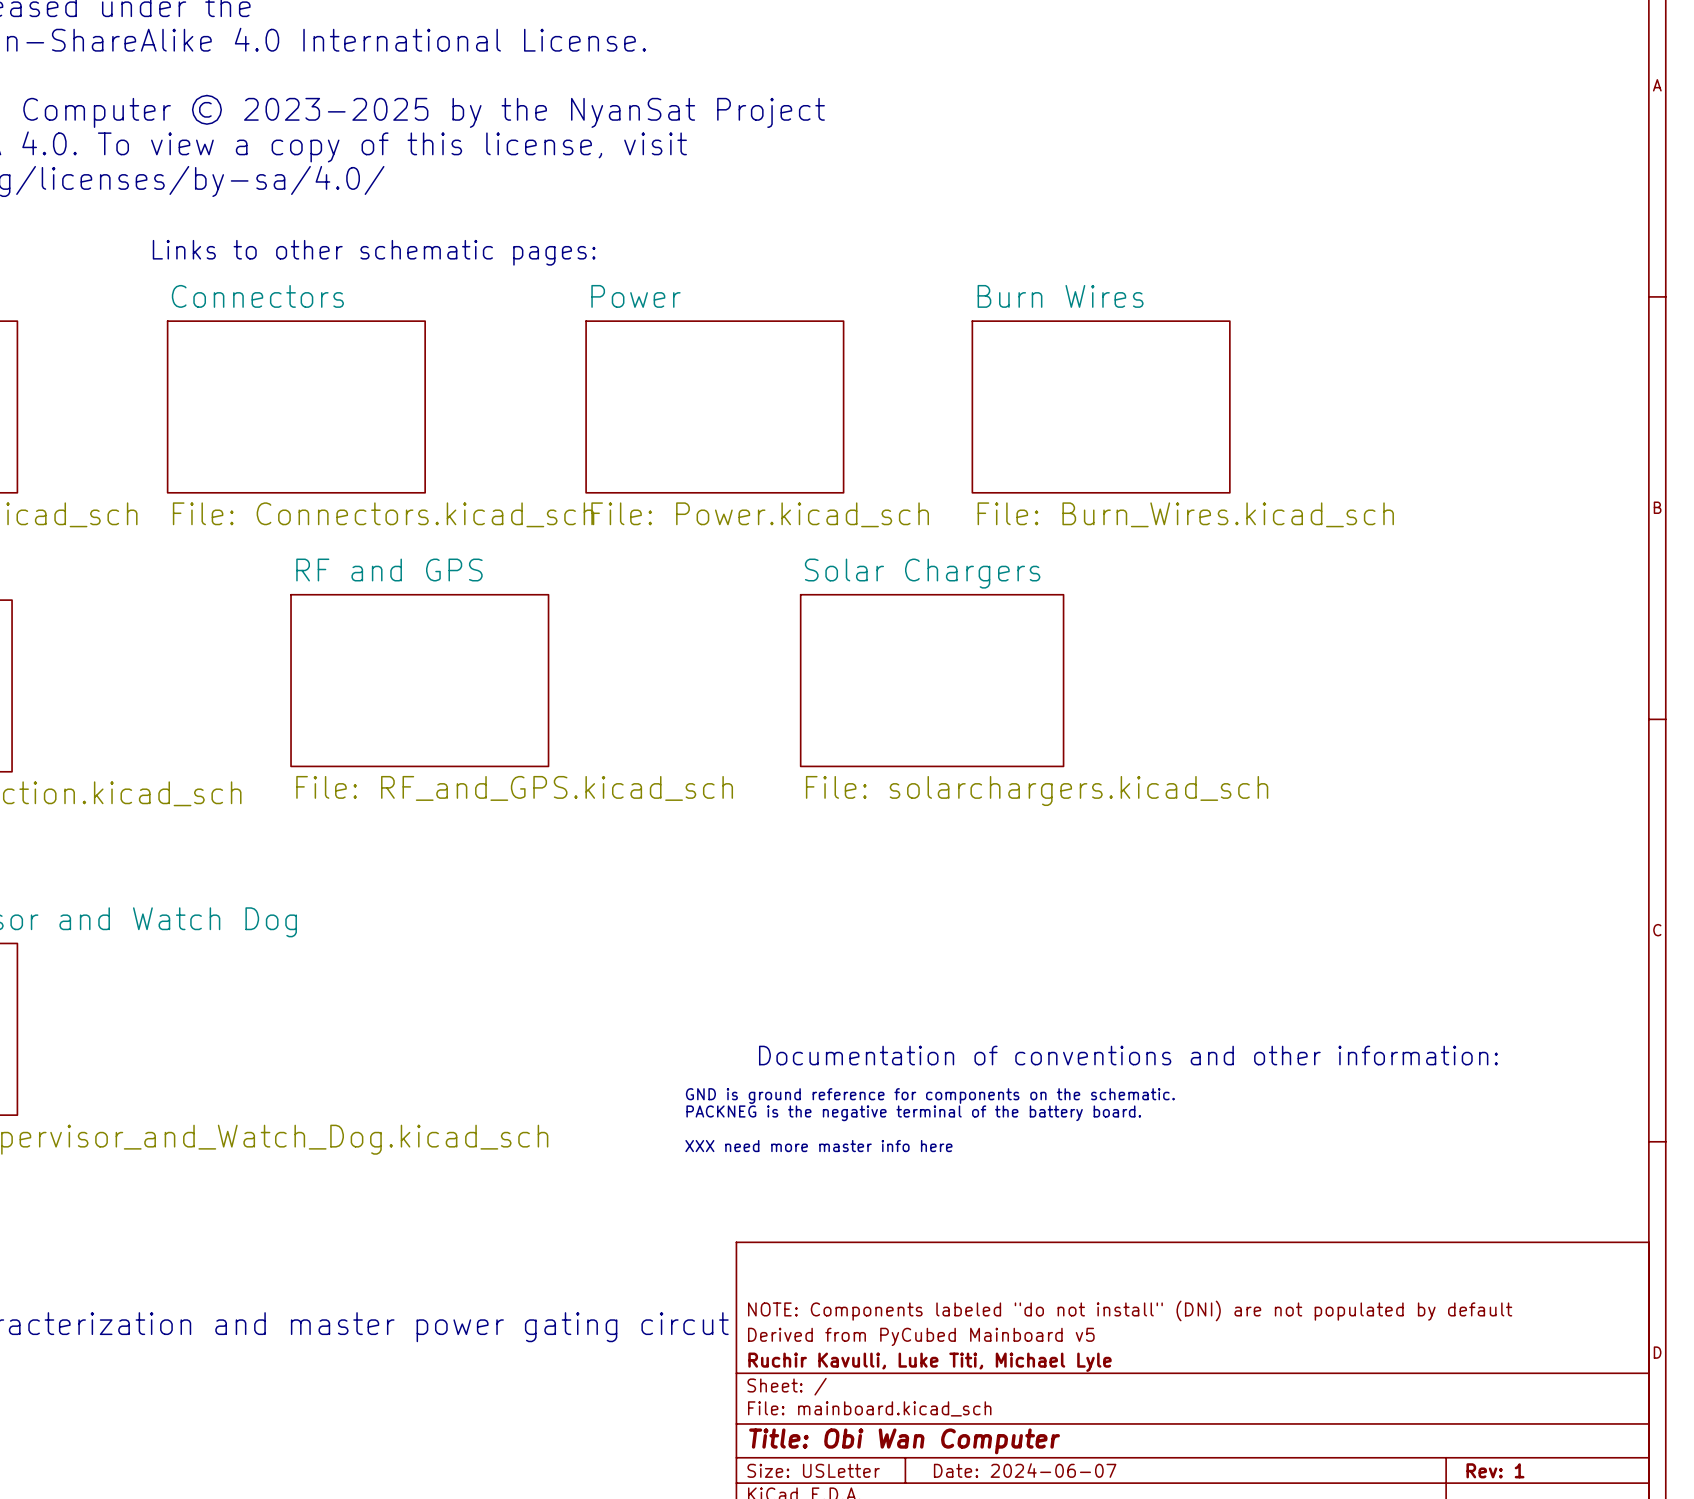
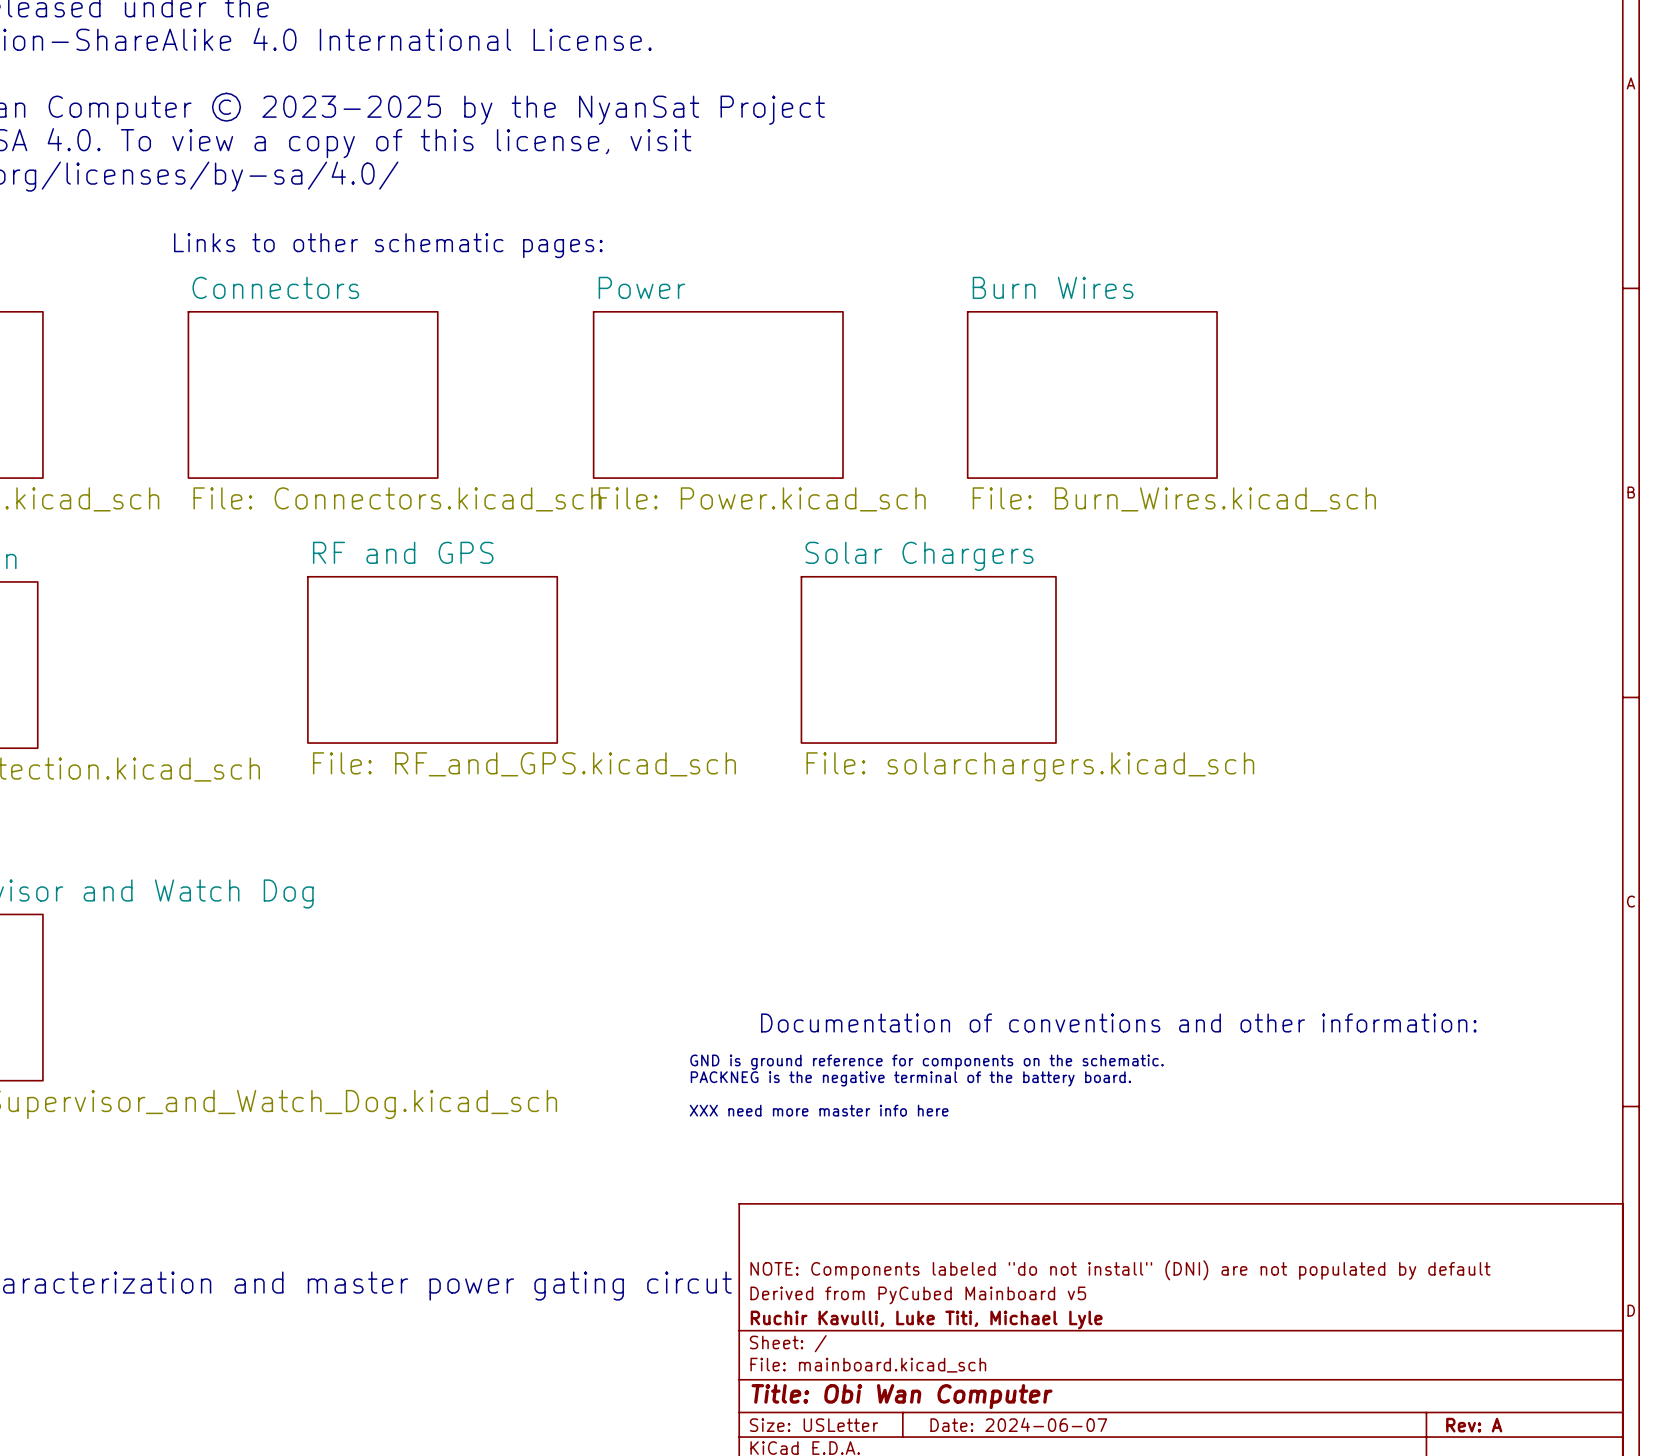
title block: Rev: 1 (1495, 1470) -> Rev: A (1474, 1425)

